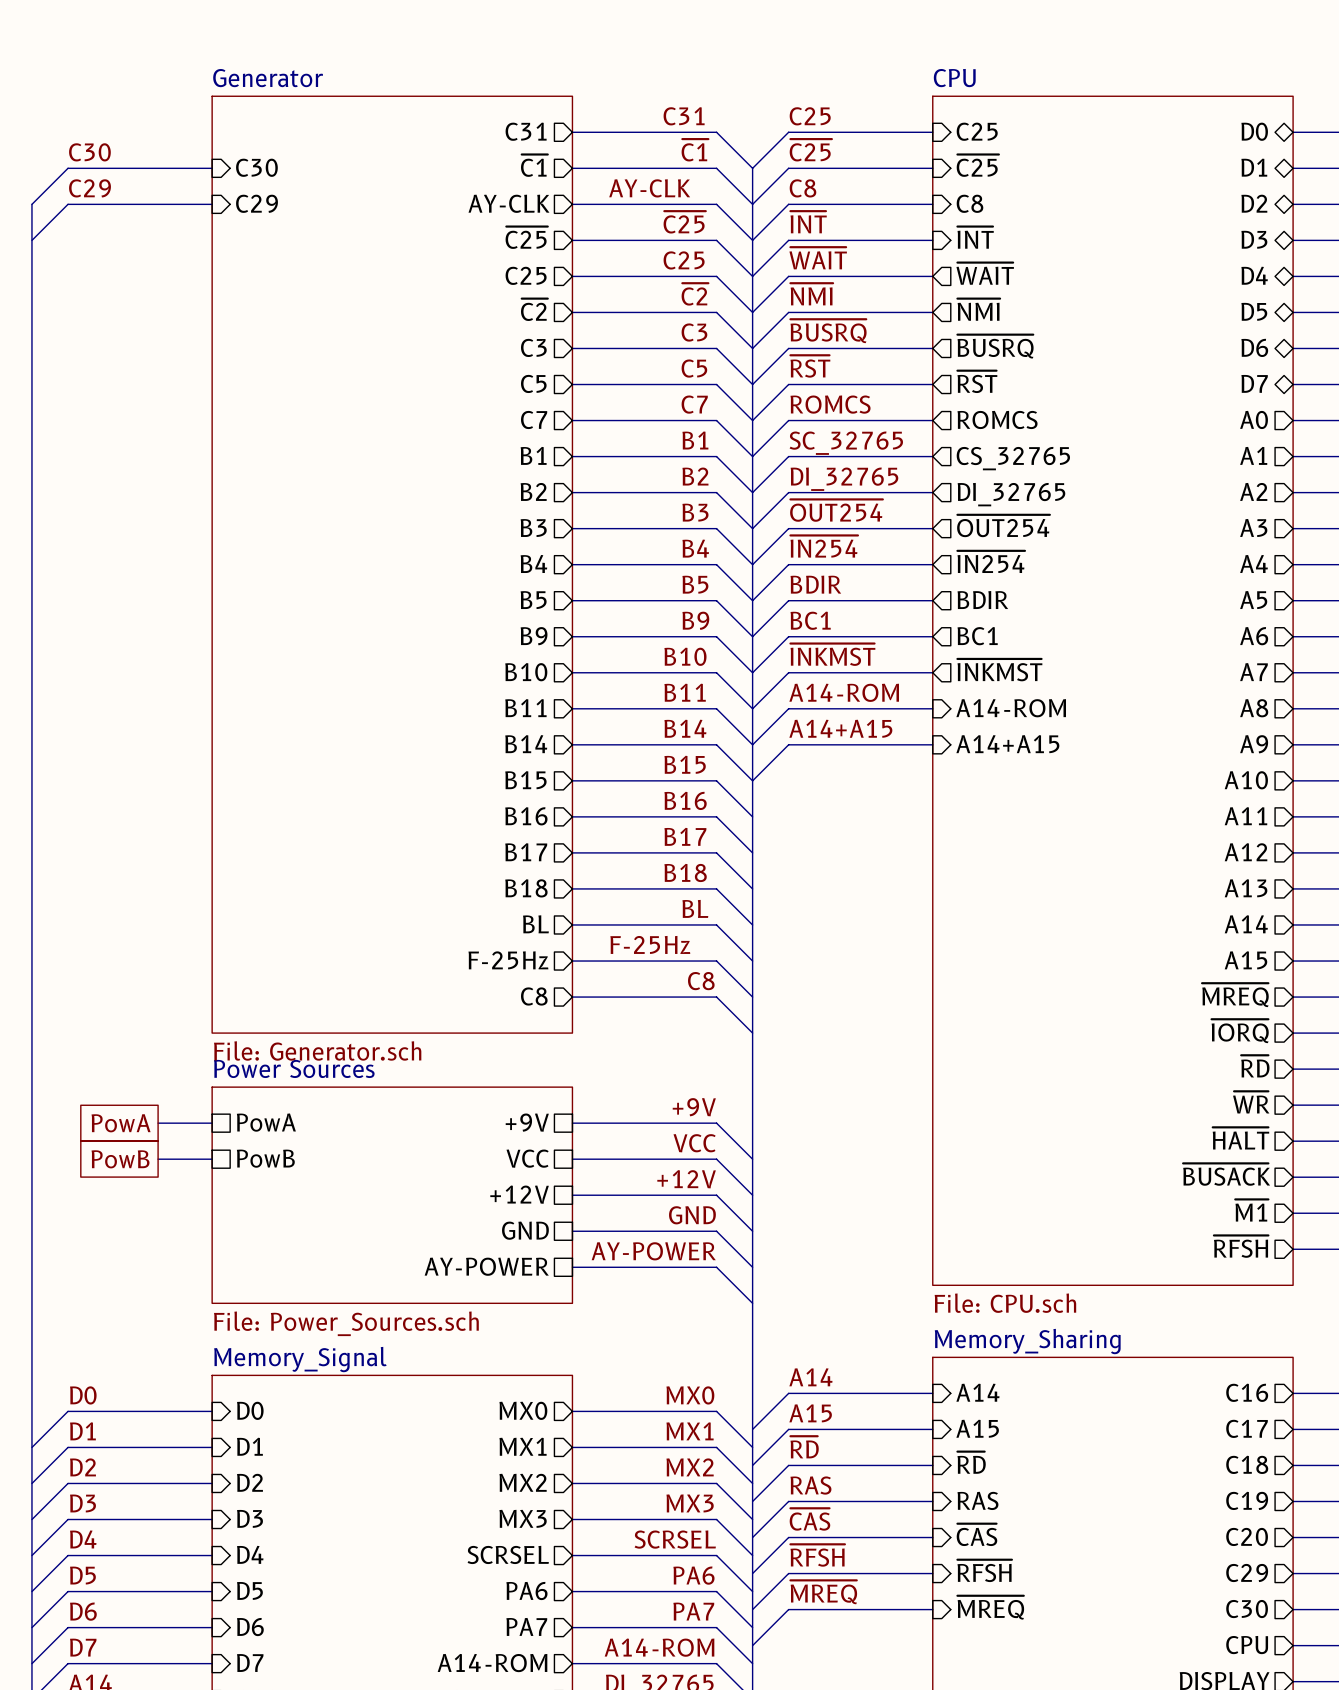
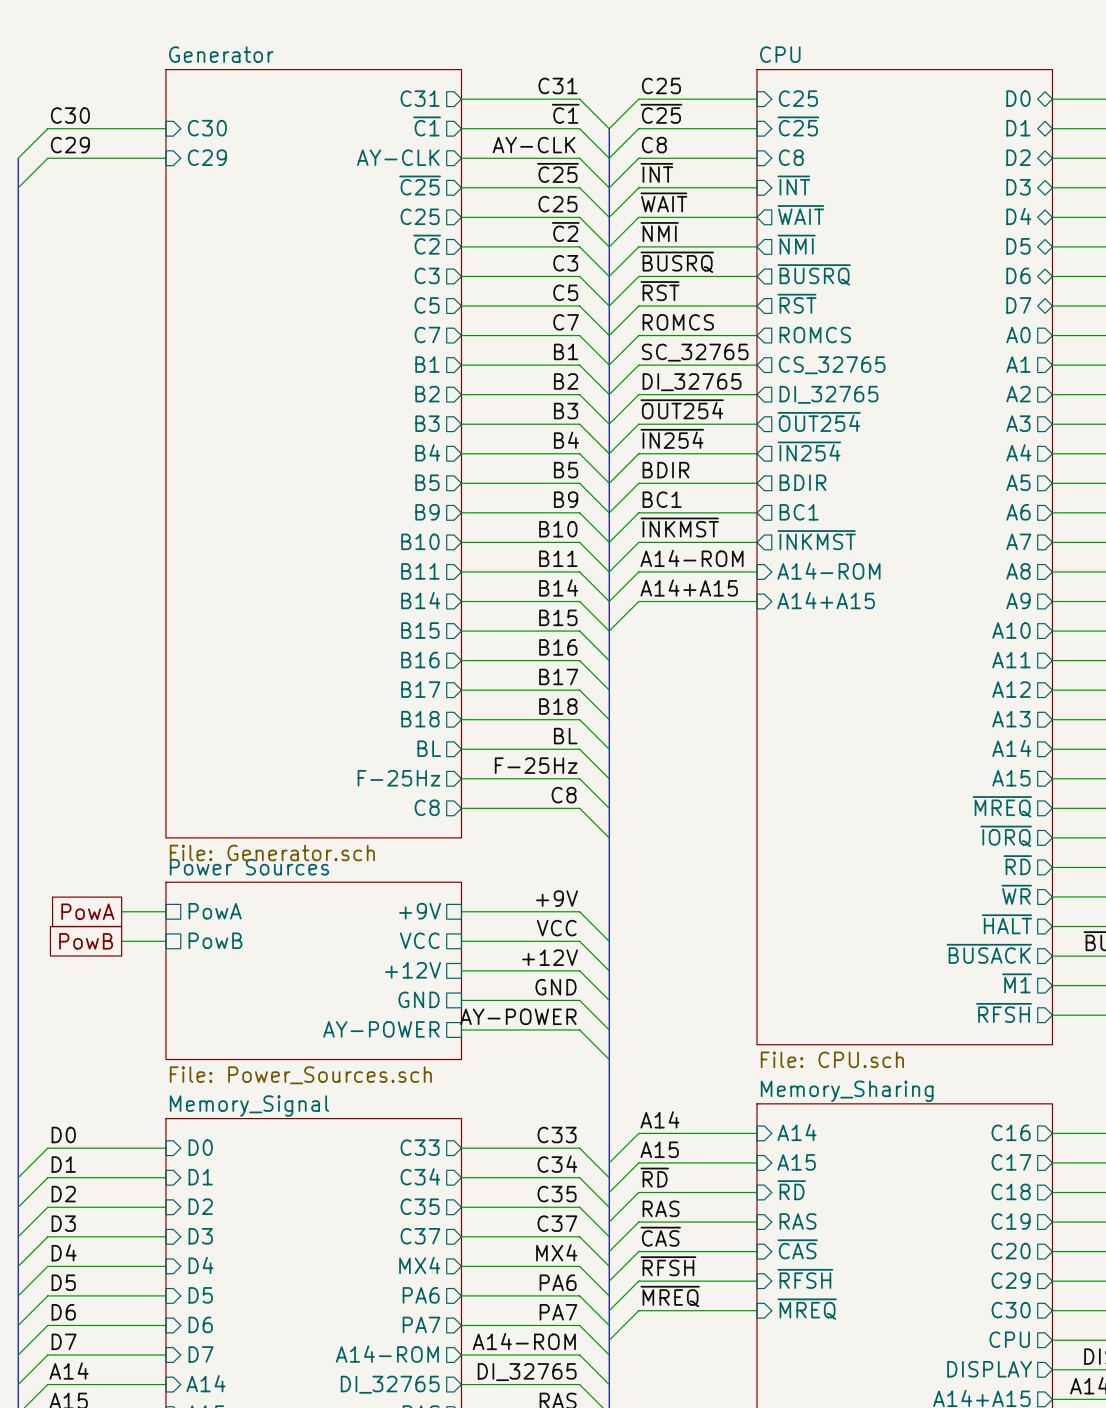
label: MX0 (690, 1395) -> C33 (557, 1134)
sheet pin: MX0 (523, 1410) -> C33 (420, 1147)
label: MX1 (690, 1431) -> C34 (557, 1164)
sheet pin: MX1 (523, 1446) -> C34 (420, 1176)
label: MX2 (690, 1467) -> C35 (557, 1194)
sheet pin: MX2 (523, 1482) -> C35 (420, 1206)
label: MX3 (690, 1503) -> C37 (557, 1223)
sheet pin: MX3 (523, 1518) -> C37 (420, 1236)
label: SCRSEL (675, 1539) -> MX4 (556, 1252)
sheet pin: SCRSEL (508, 1554) -> MX4 (419, 1265)

